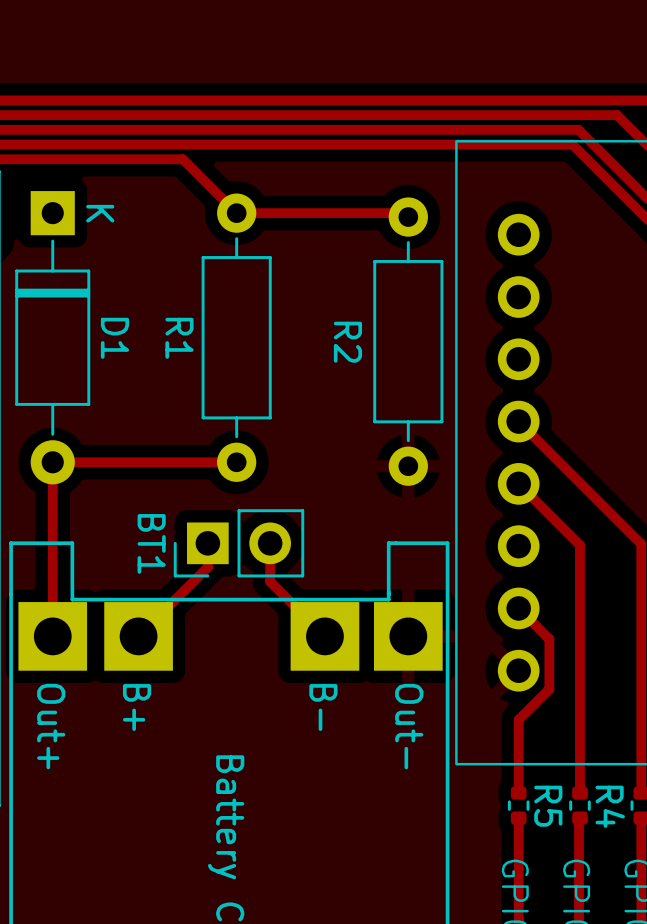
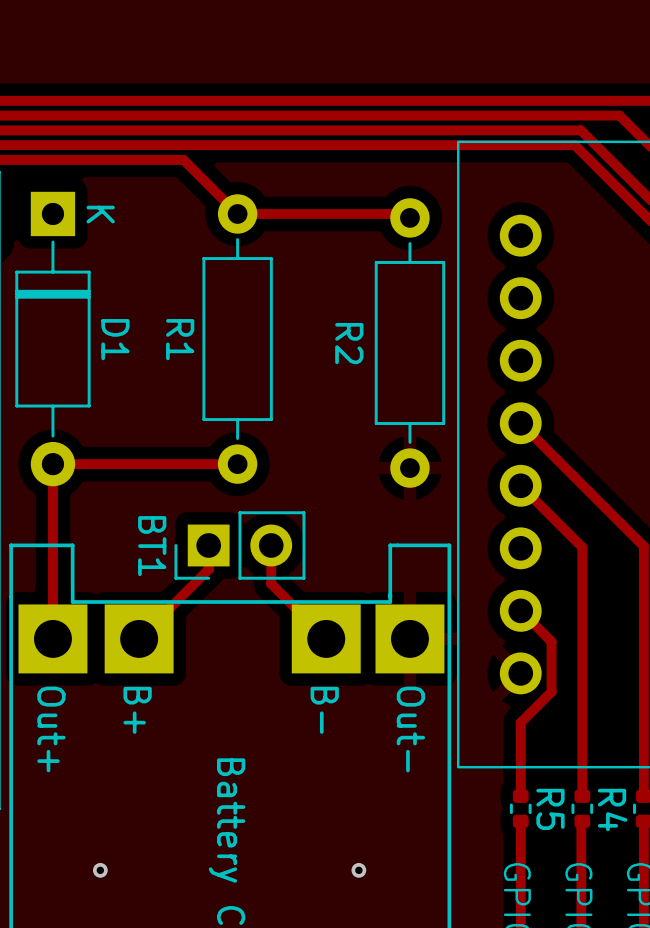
via: none -> (100, 870)
via: none -> (358, 870)

